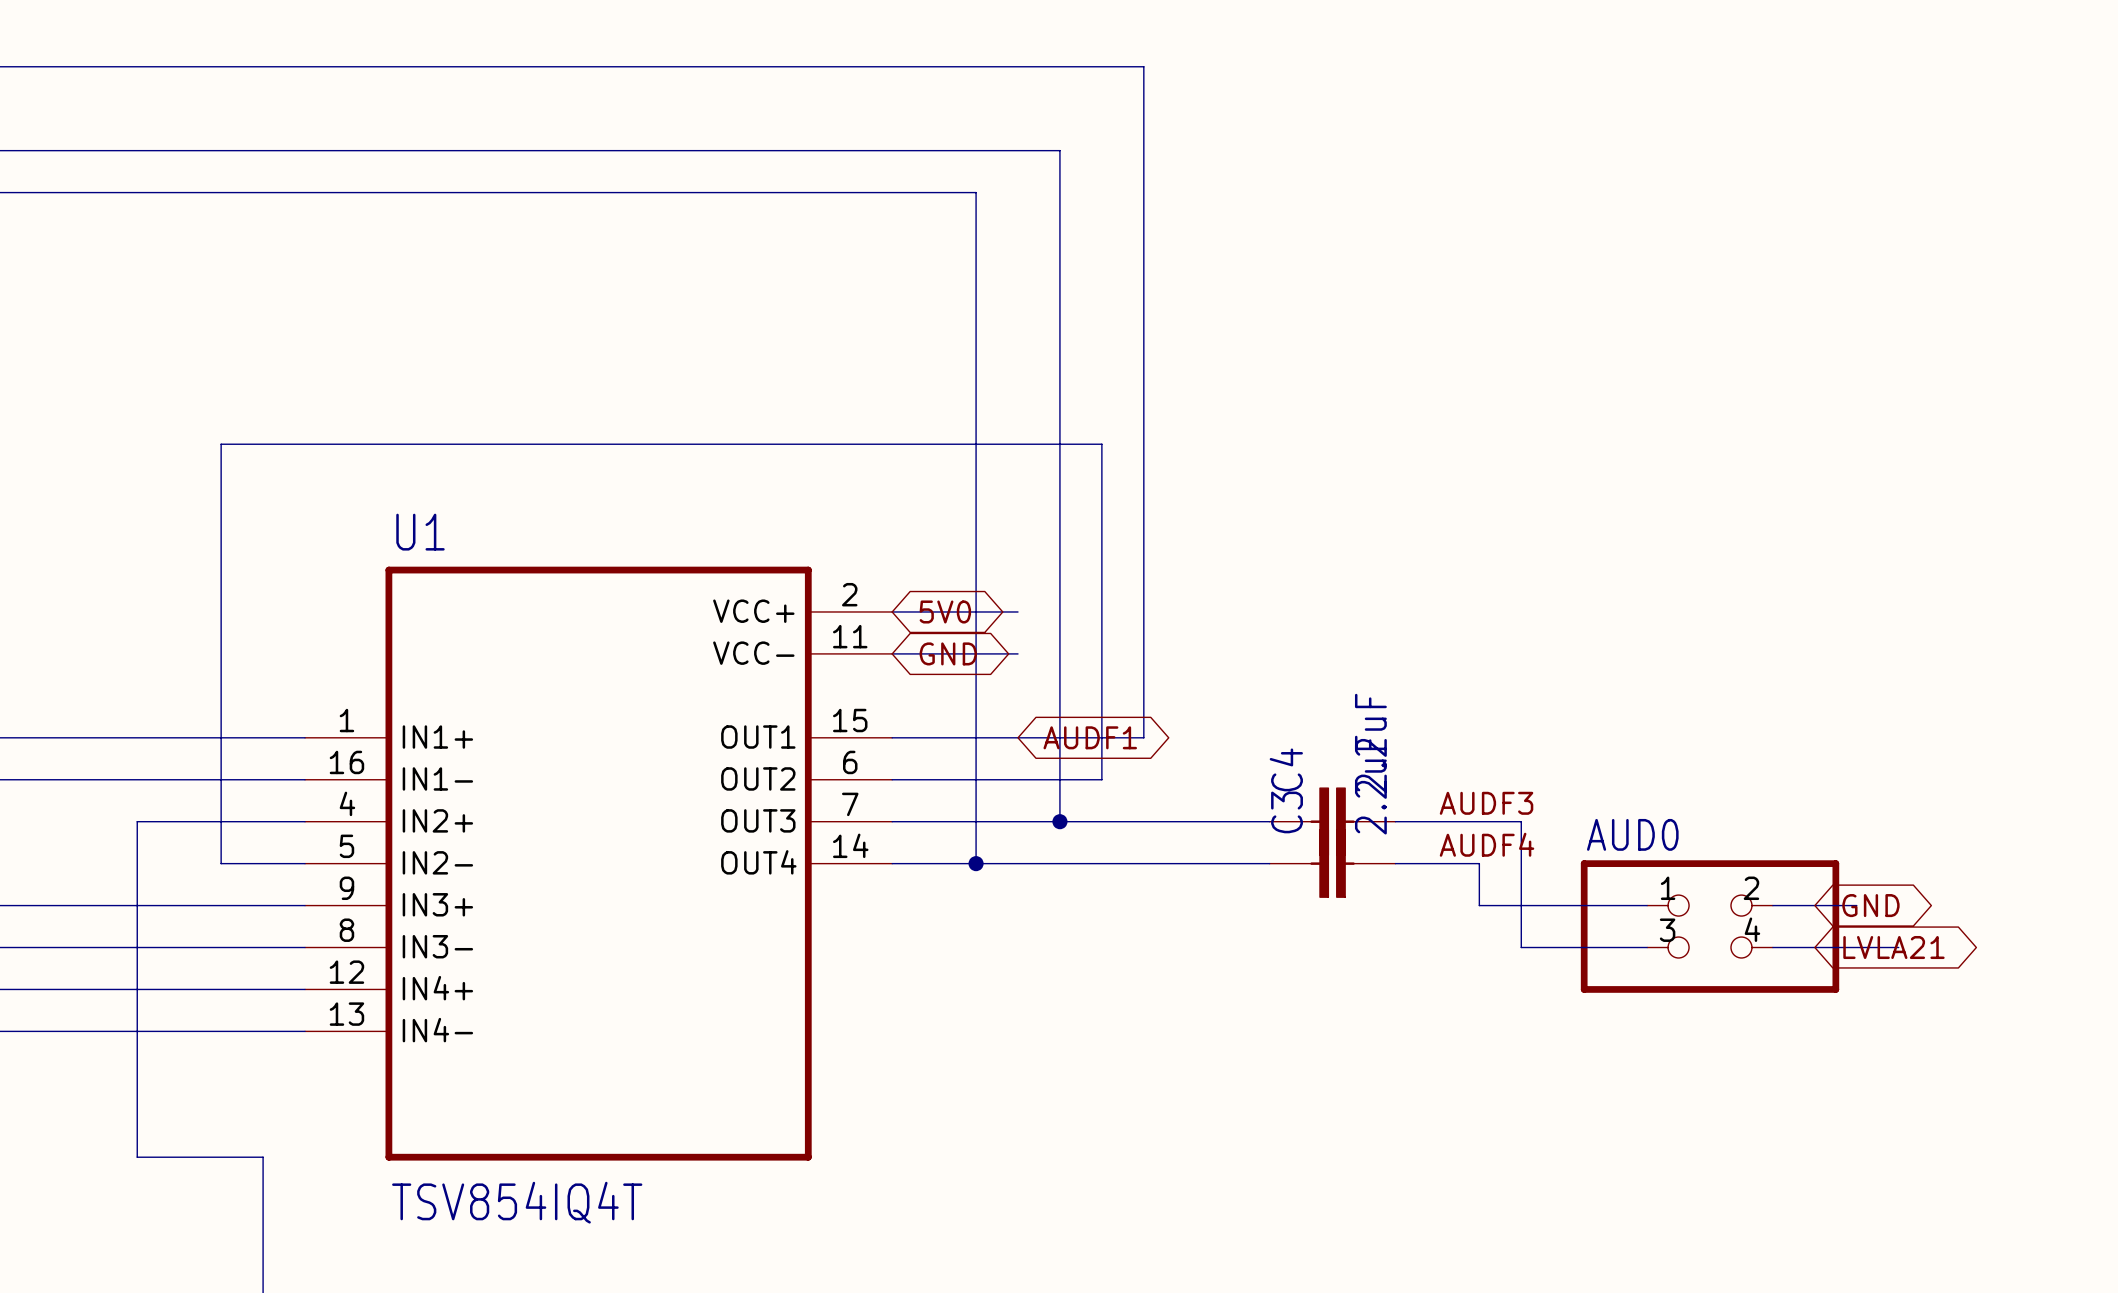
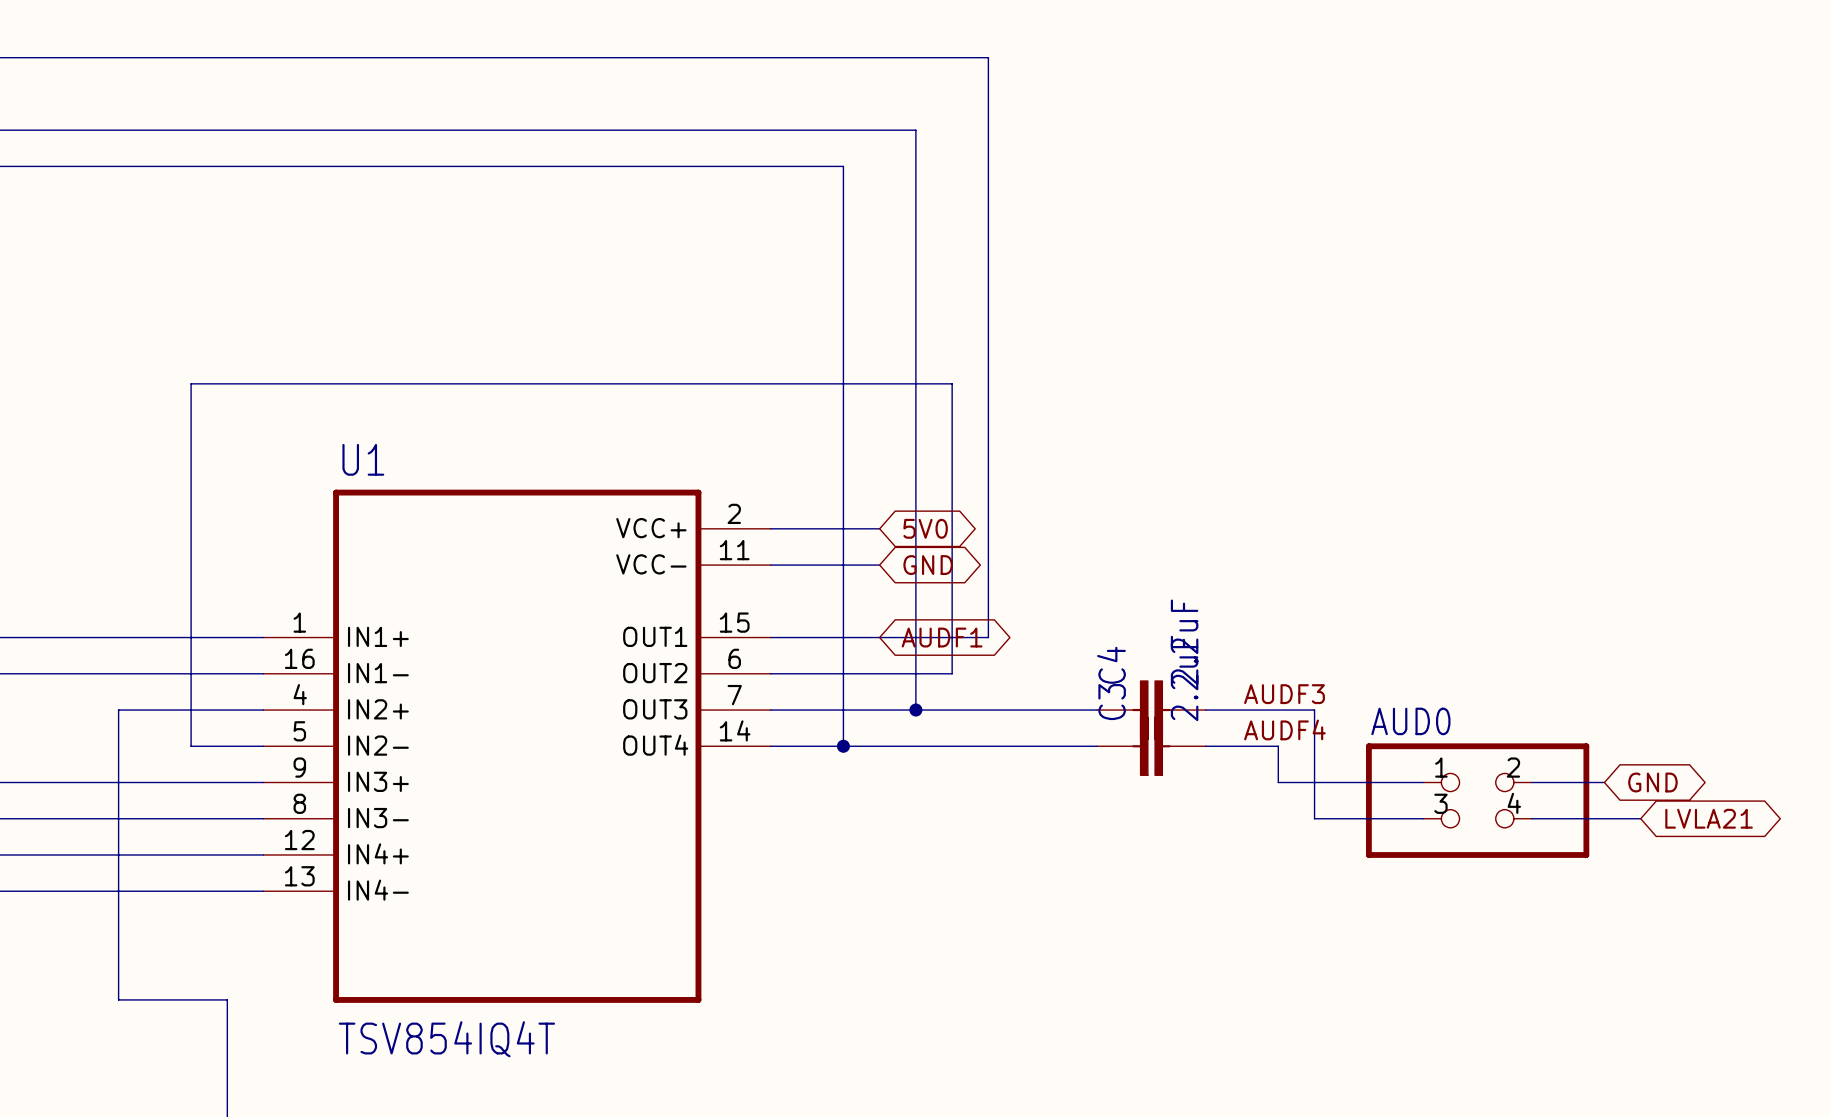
global label position: 5V0 (945, 611) -> 5V0 (925, 528)
global label position: GND (948, 653) -> GND (928, 565)
global label position: GND (1870, 905) -> GND (1652, 782)
global label position: LVLA21 (1893, 947) -> LVLA21 (1709, 818)

